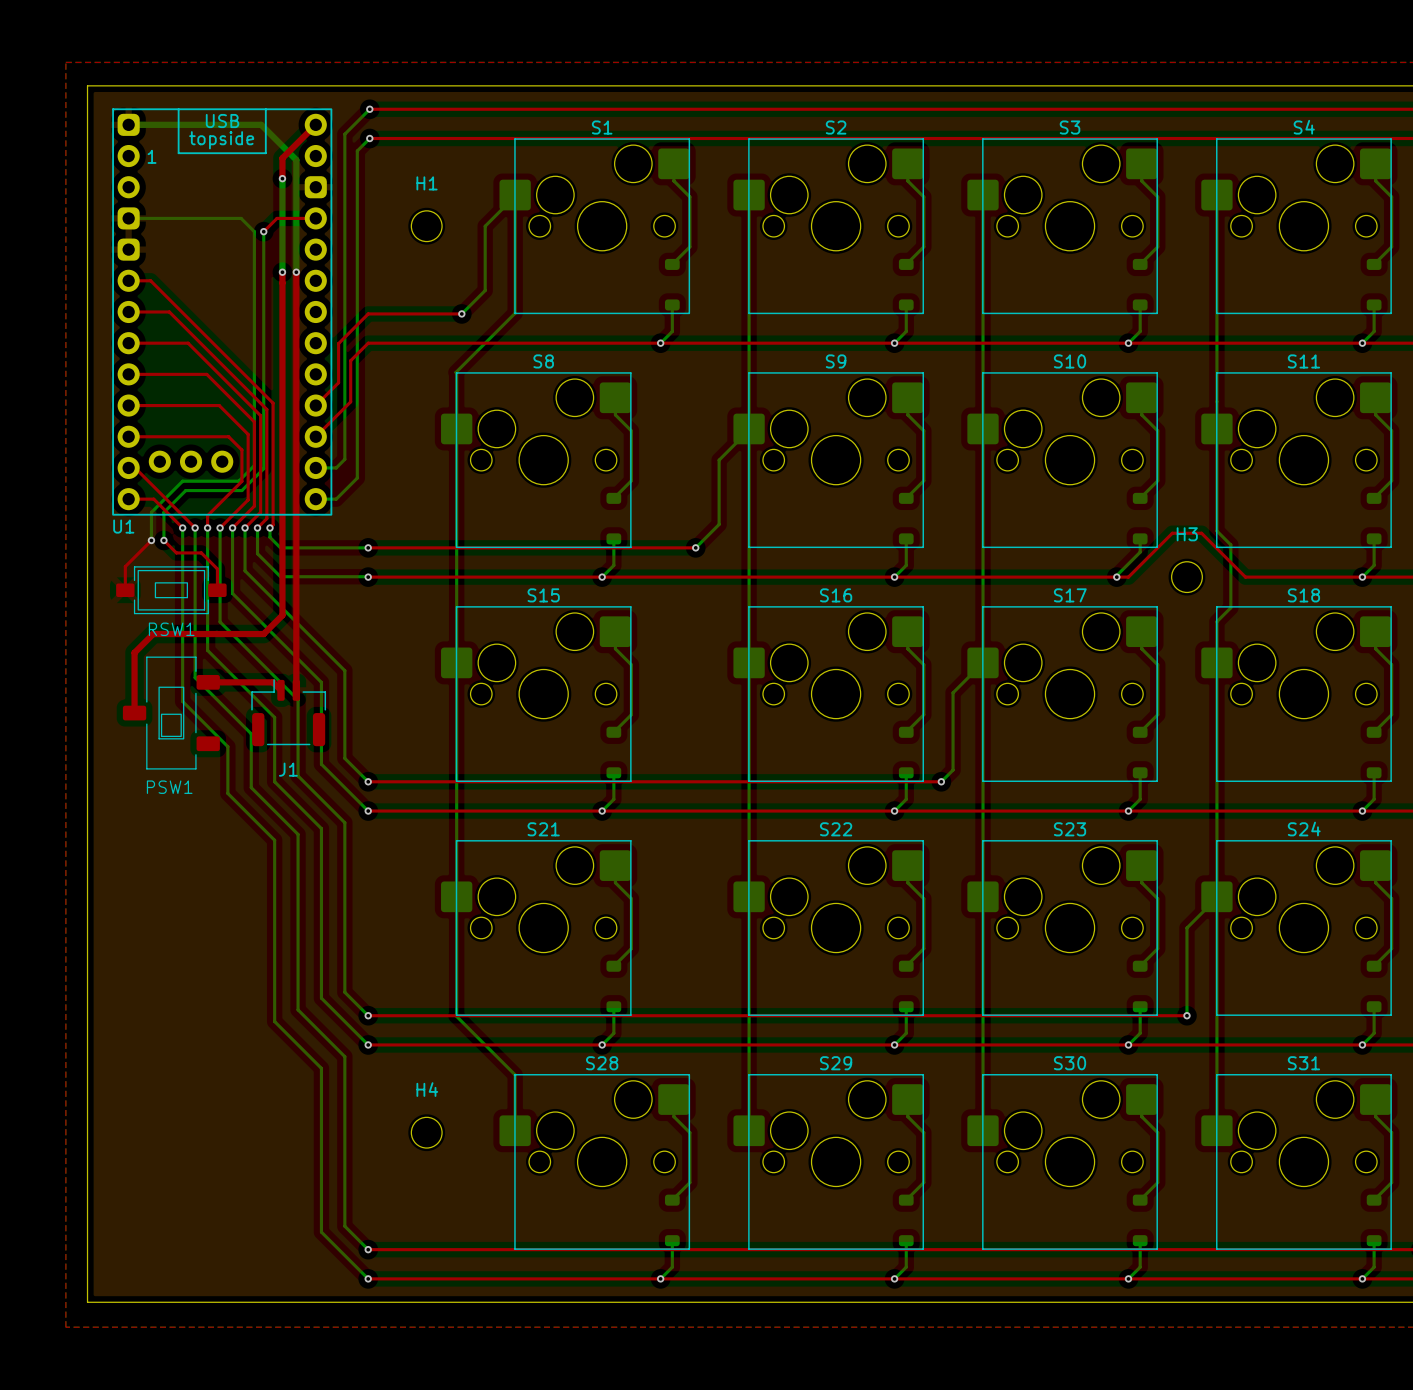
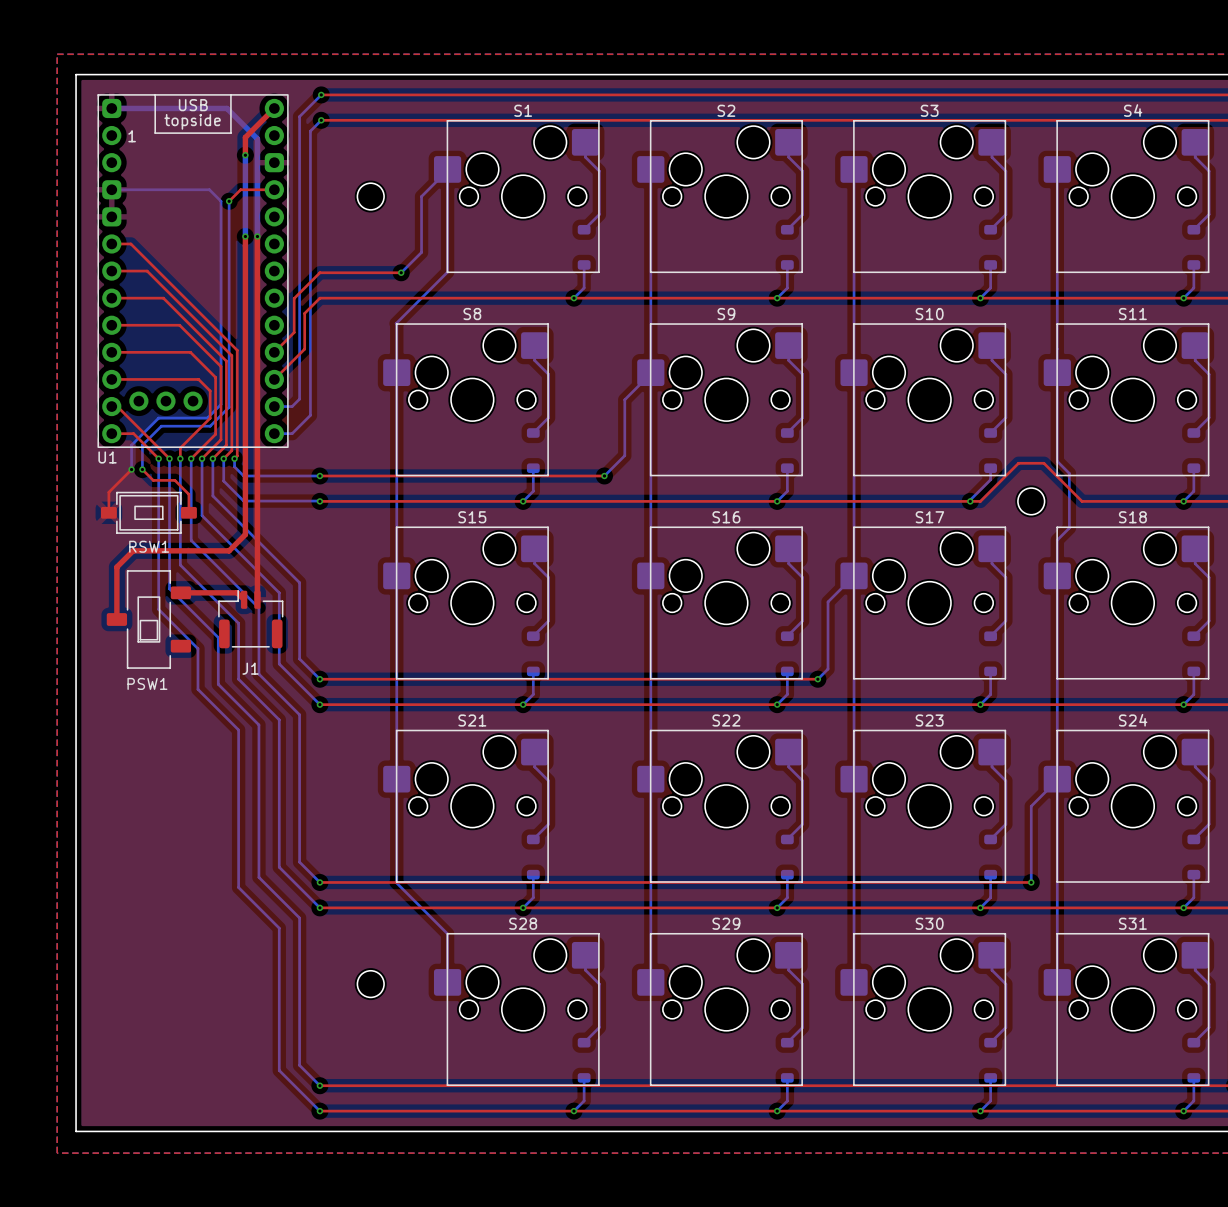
H1 name: H1 (427, 183) -> none
H3 name: H3 (1187, 534) -> none
H4 name: H4 (427, 1089) -> none

